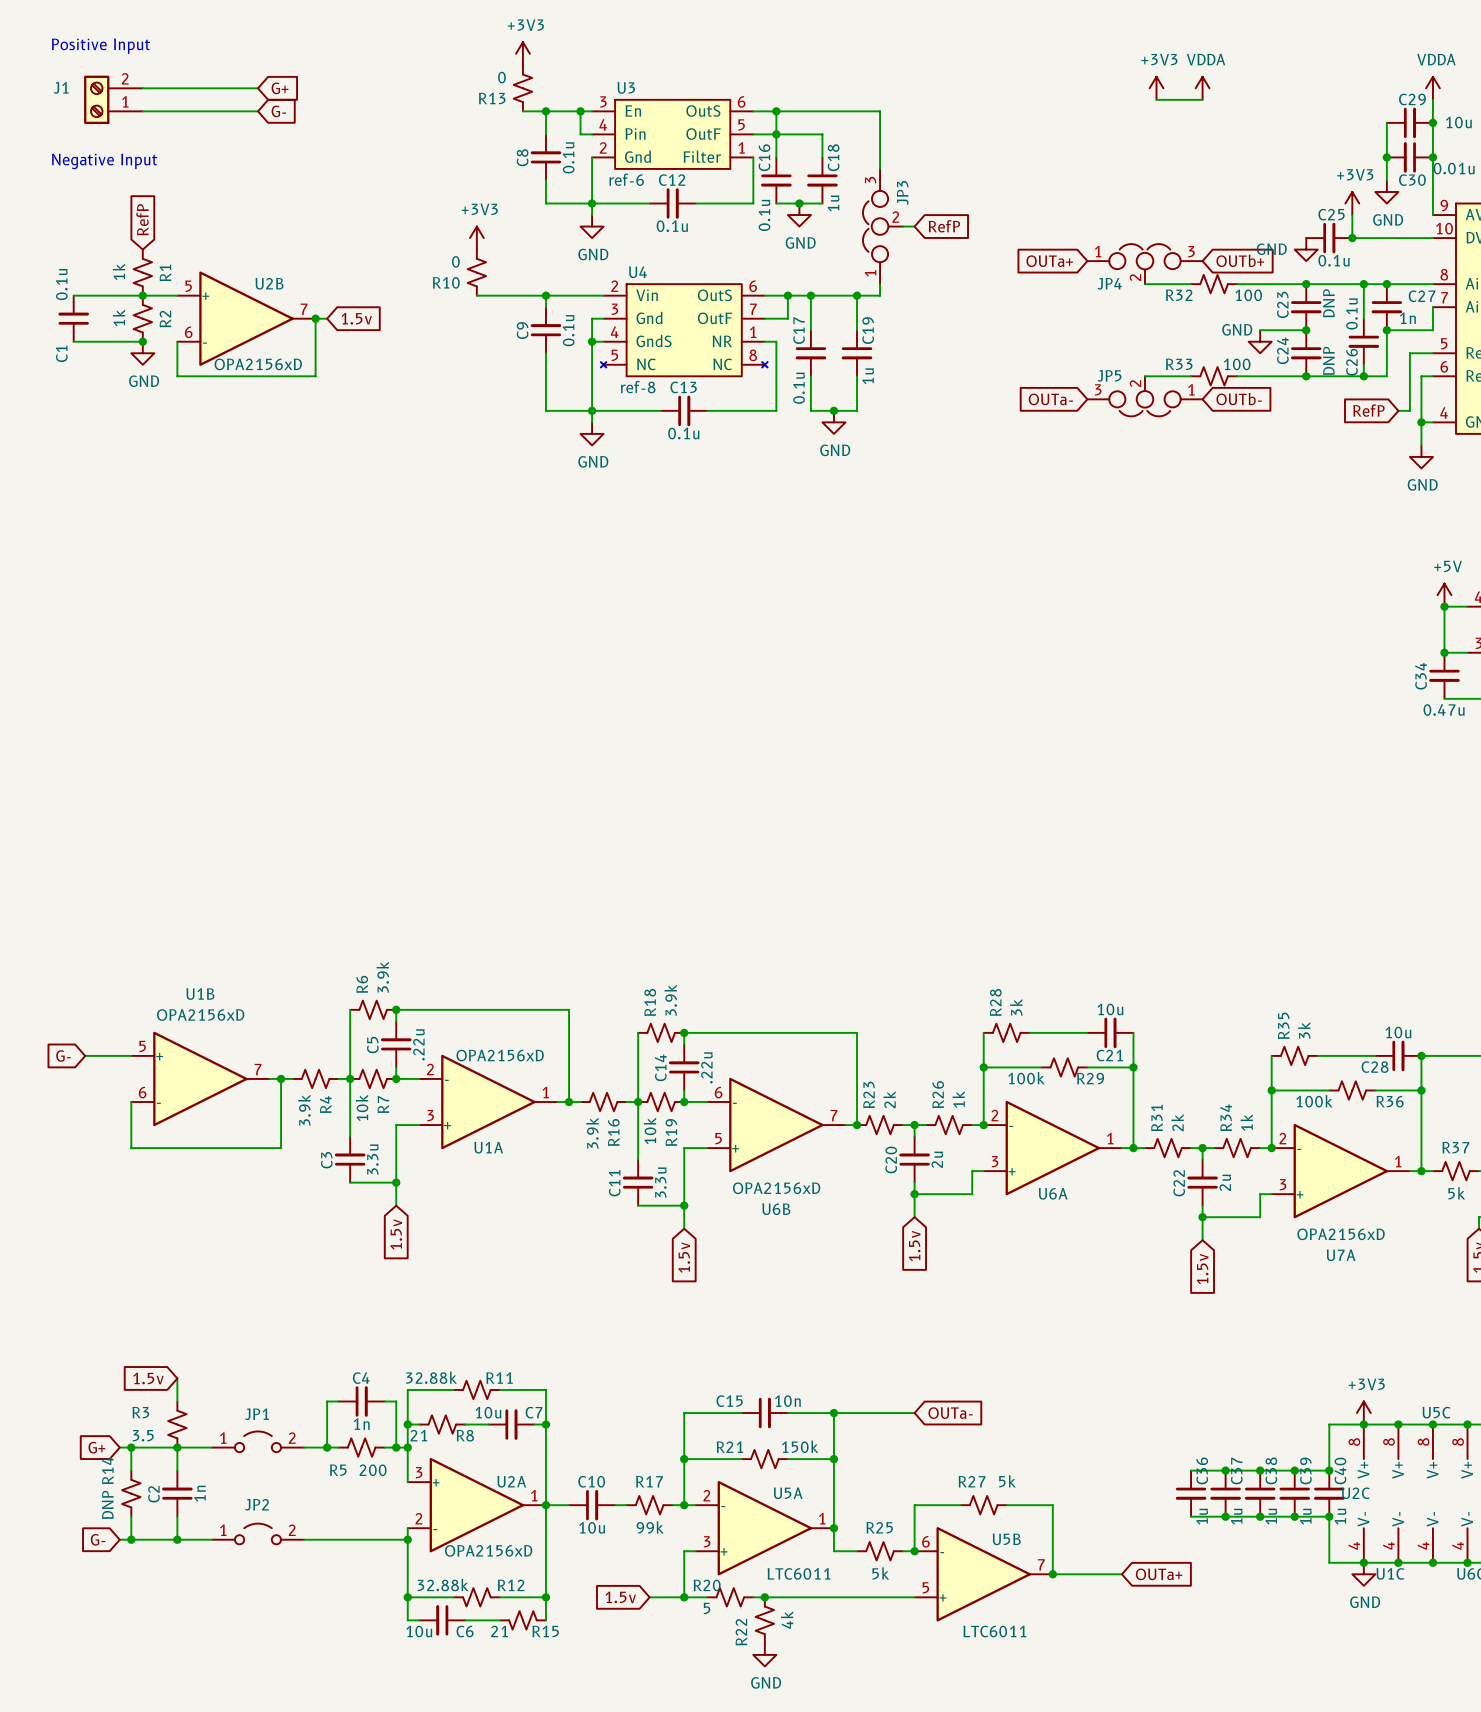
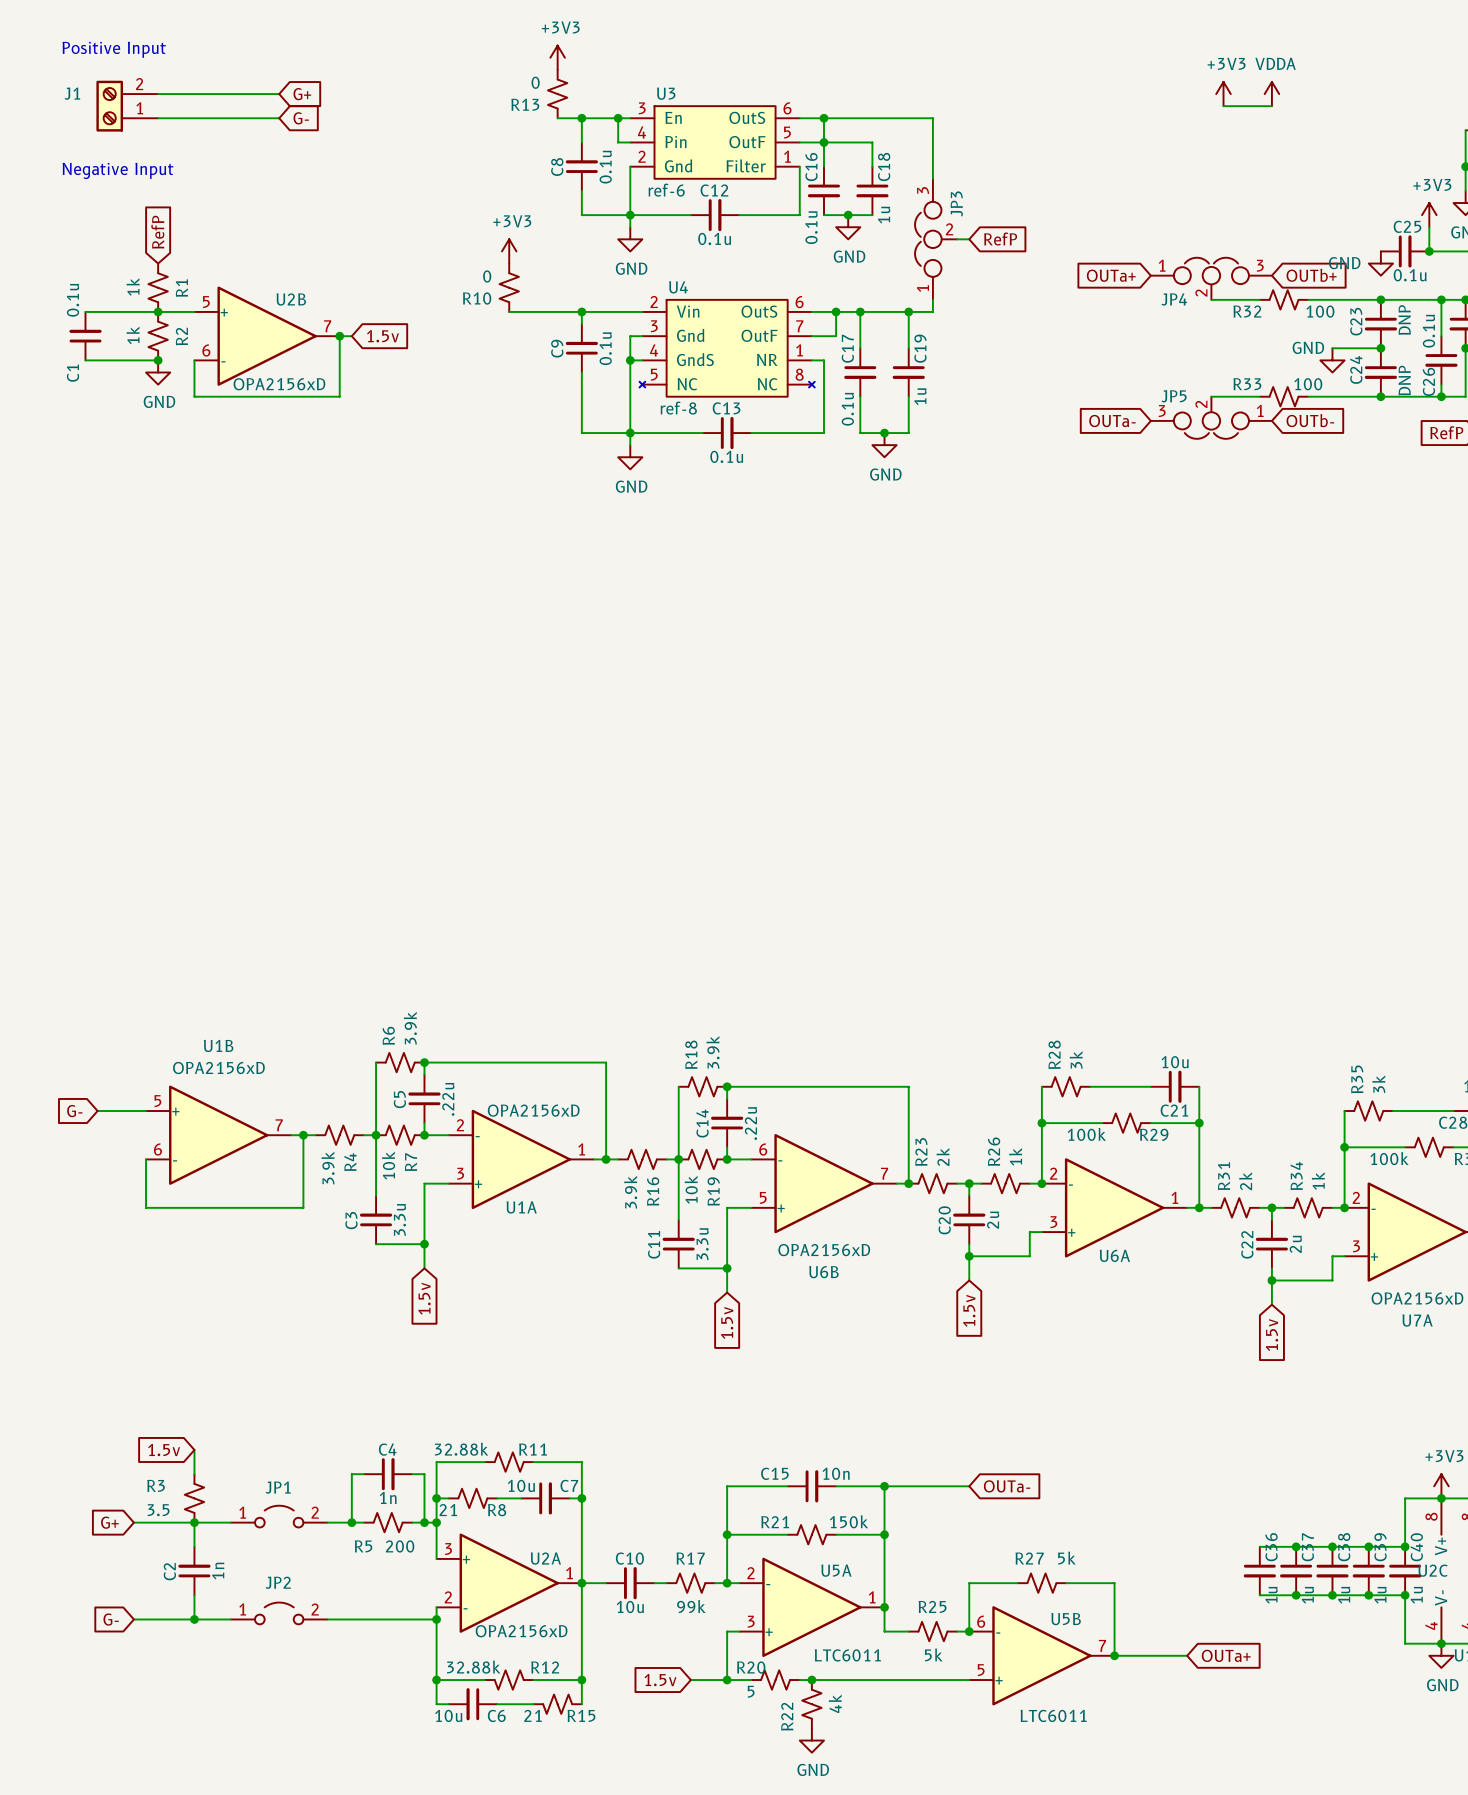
wire: (131, 1447) (131, 1470) -> none
junction: (131, 1447) -> none
R14: DNP (131, 1493) -> none
wire: (131, 1516) (131, 1539) -> none
junction: (131, 1539) -> none

